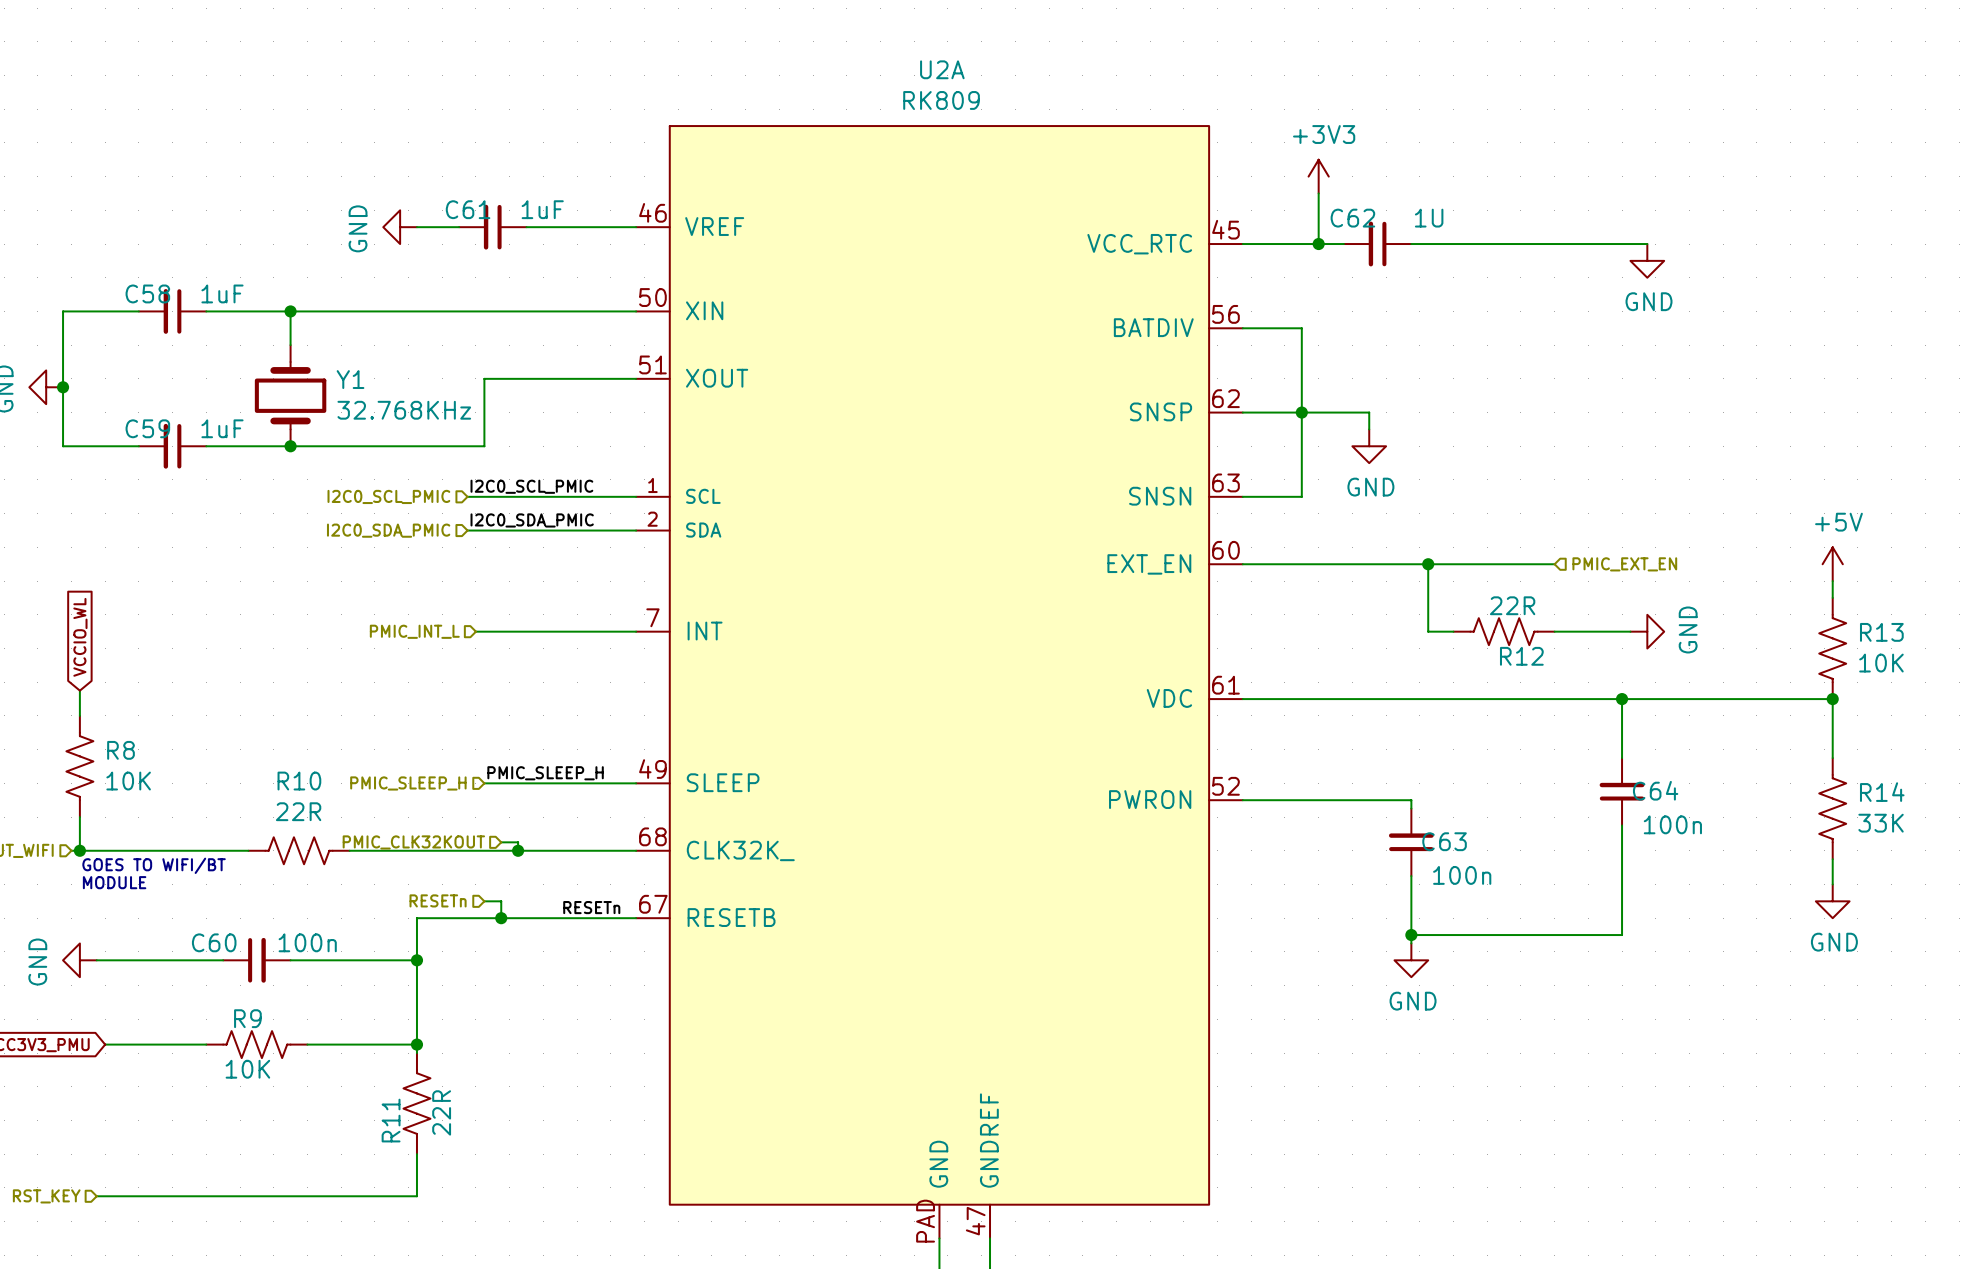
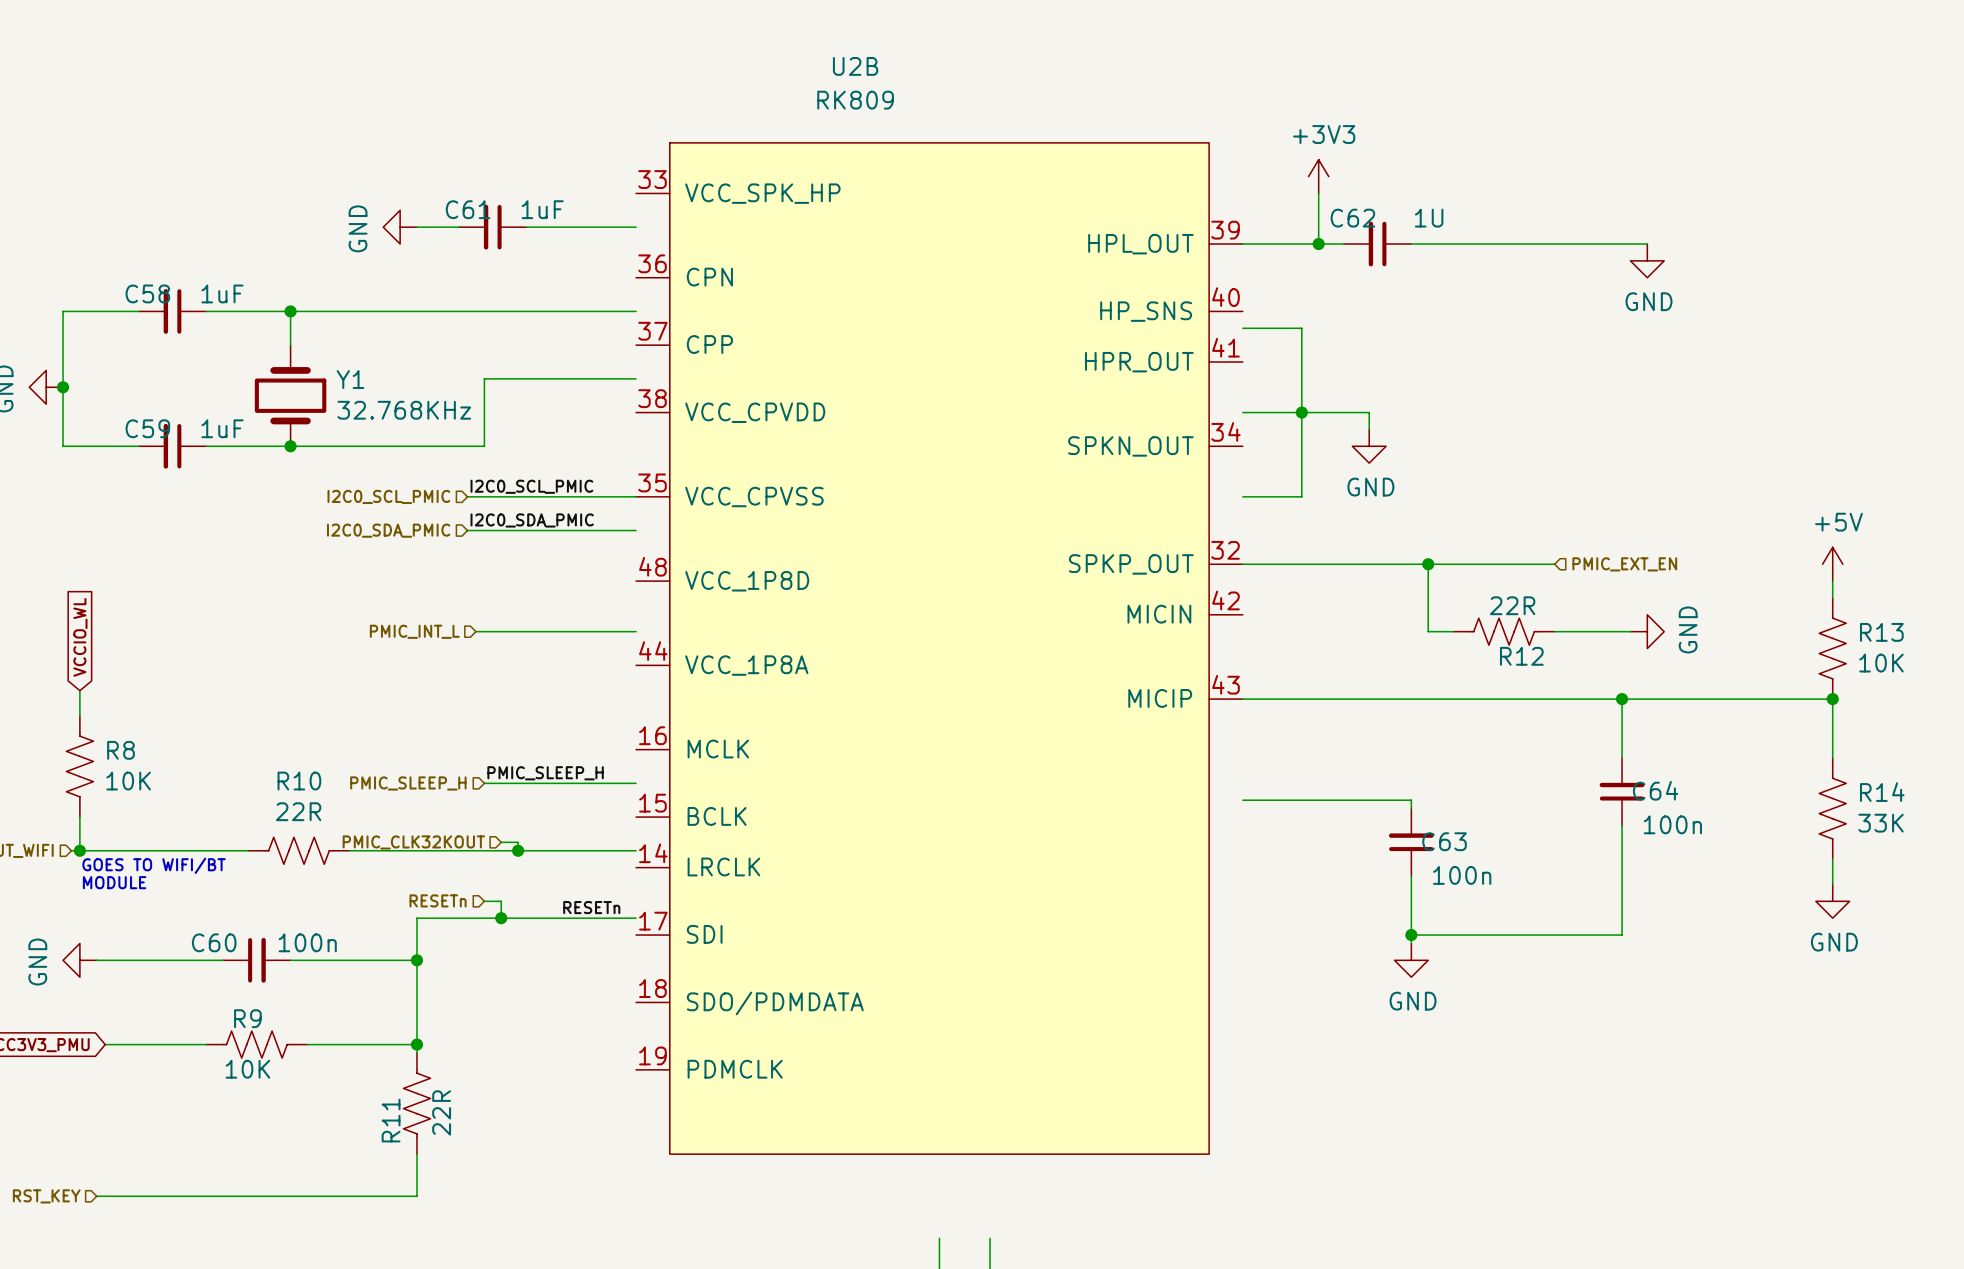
U2B: none -> RK809 (939, 648)
U2A: RK809 (939, 682) -> none

